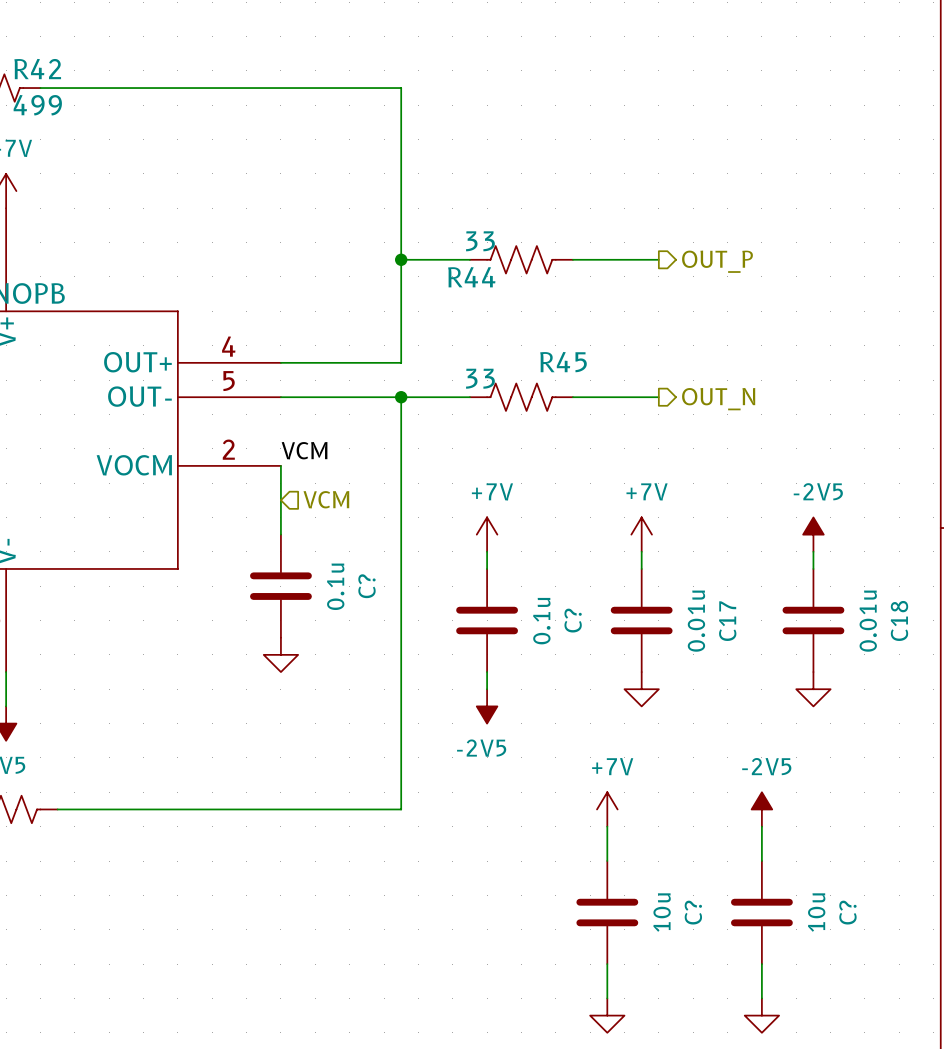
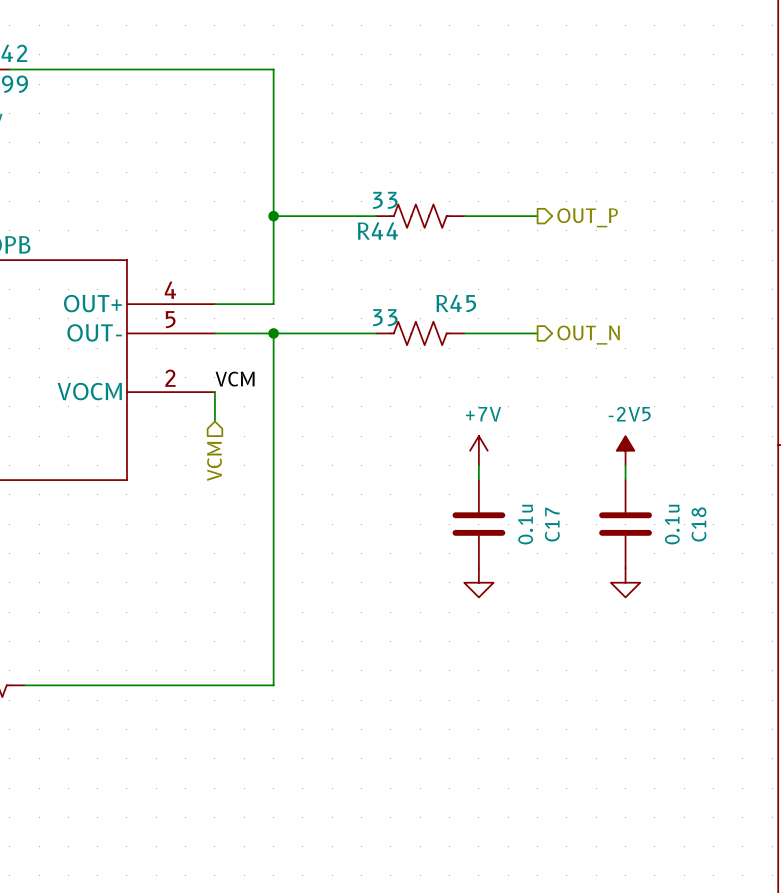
wire: (349, 88) (401, 88) (401, 362) (349, 362) -> (273, 69) (273, 304)
wire: none -> (273, 216) (317, 216)
junction position: (401, 259) -> (273, 216)
wire: (401, 397) (401, 809) (349, 809) -> (273, 333) (273, 685)
junction position: (401, 397) -> (273, 333)
hierarchical label rotation: 0° (326, 499) -> 90° clockwise (214, 461)
hierarchical label position: VCM (326, 499) -> VCM (214, 461)
wire: (280, 500) (280, 534) -> none
power symbol: +7V (487, 534) -> none
power symbol: none -> +7V (478, 450)
power symbol: +7V (641, 534) -> none
power symbol position: -2V5 (813, 534) -> -2V5 (625, 450)
wire: (487, 551) (487, 568) -> none
wire: (641, 551) (641, 568) -> (478, 465) (478, 480)
wire: (813, 551) (813, 568) -> (625, 465) (625, 480)
C?: 0.1u (280, 586) -> none
C?: 0.1u (487, 620) -> none
C17 position: (641, 620) -> (478, 524)
C18 position: (813, 620) -> (625, 524)
C17 value: 0.01u (696, 621) -> 0.1u (525, 524)
C18 value: 0.01u (868, 621) -> 0.1u (672, 524)
power symbol: (280, 654) -> none
wire: (487, 672) (487, 689) -> none
power symbol position: (641, 689) -> (478, 582)
power symbol position: (813, 689) -> (625, 582)
power symbol: -2V5 (487, 706) -> none
power symbol: +7V (607, 809) -> none
power symbol: -2V5 (761, 809) -> none
wire: (607, 826) (607, 861) -> none
wire: (761, 826) (761, 861) -> none
C?: 10u (607, 912) -> none
C?: 10u (761, 912) -> none
wire: (607, 964) (607, 998) -> none
wire: (761, 964) (761, 998) -> none
power symbol: (607, 1015) -> none
power symbol: (761, 1015) -> none

